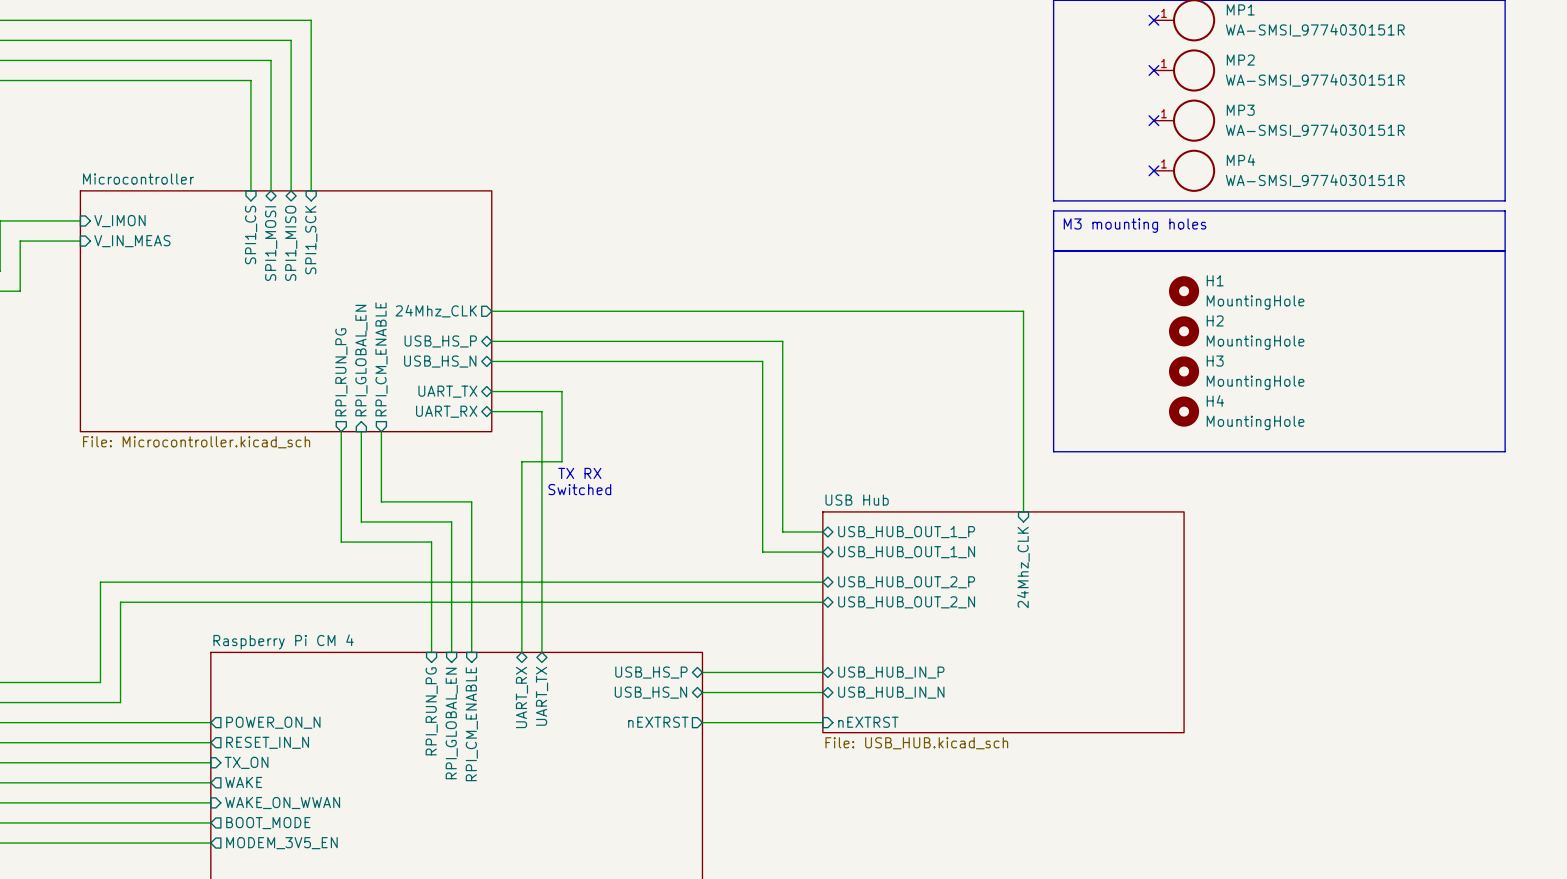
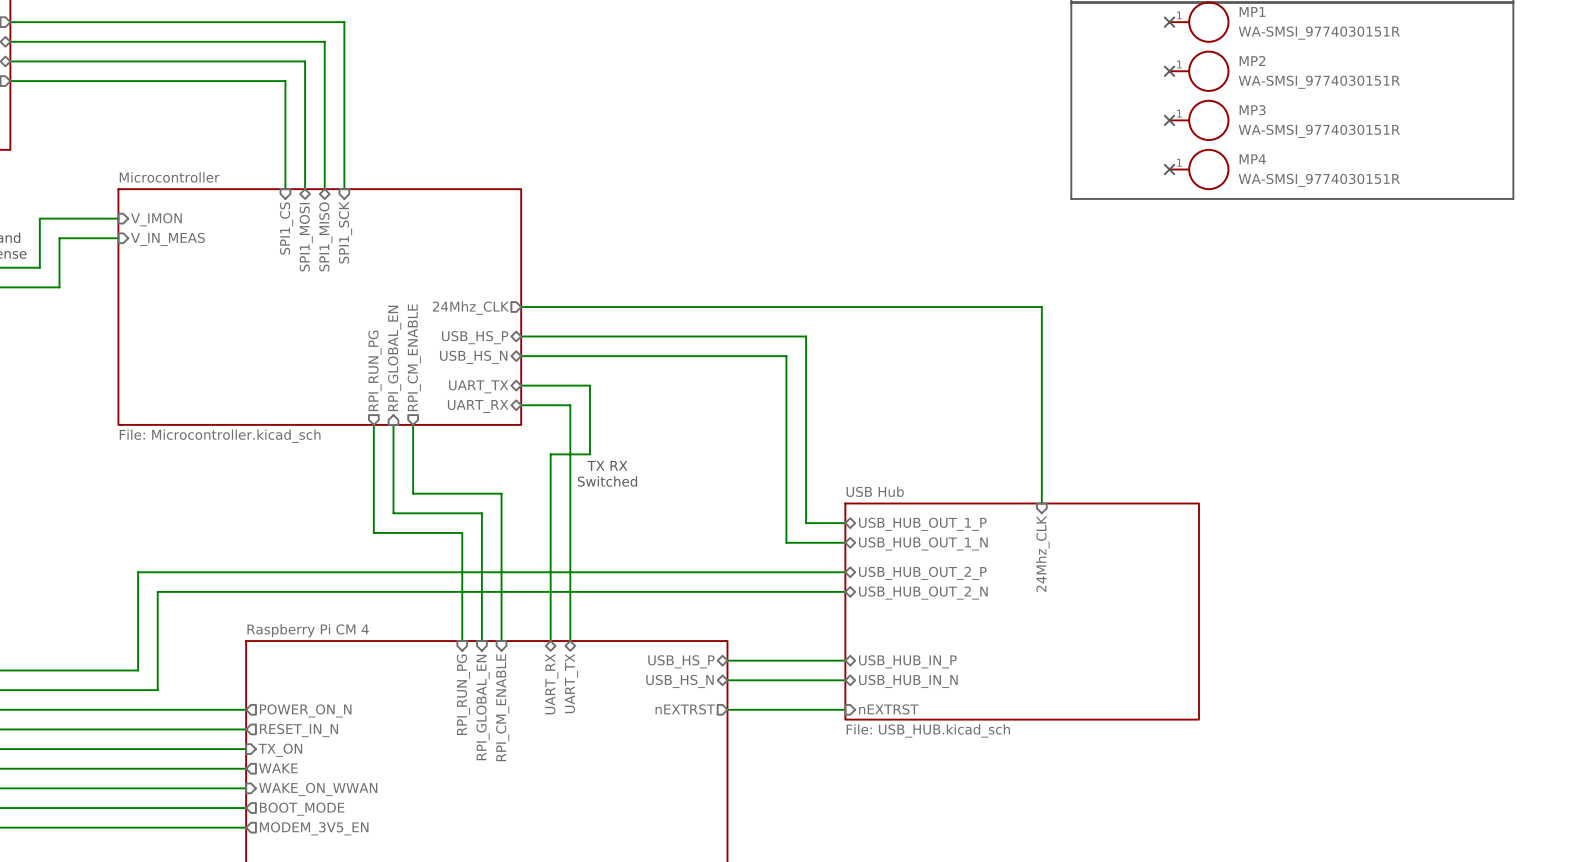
line: (1053, 210) (1053, 451) (1505, 451) (1505, 210) (1053, 210) -> none
text: M3 mounting holes (1135, 225) -> none
line: (1053, 251) (1505, 251) -> none
H1: MountingHole (1184, 291) -> none
H2: MountingHole (1184, 331) -> none
H3: MountingHole (1184, 371) -> none
H4: MountingHole (1184, 411) -> none

